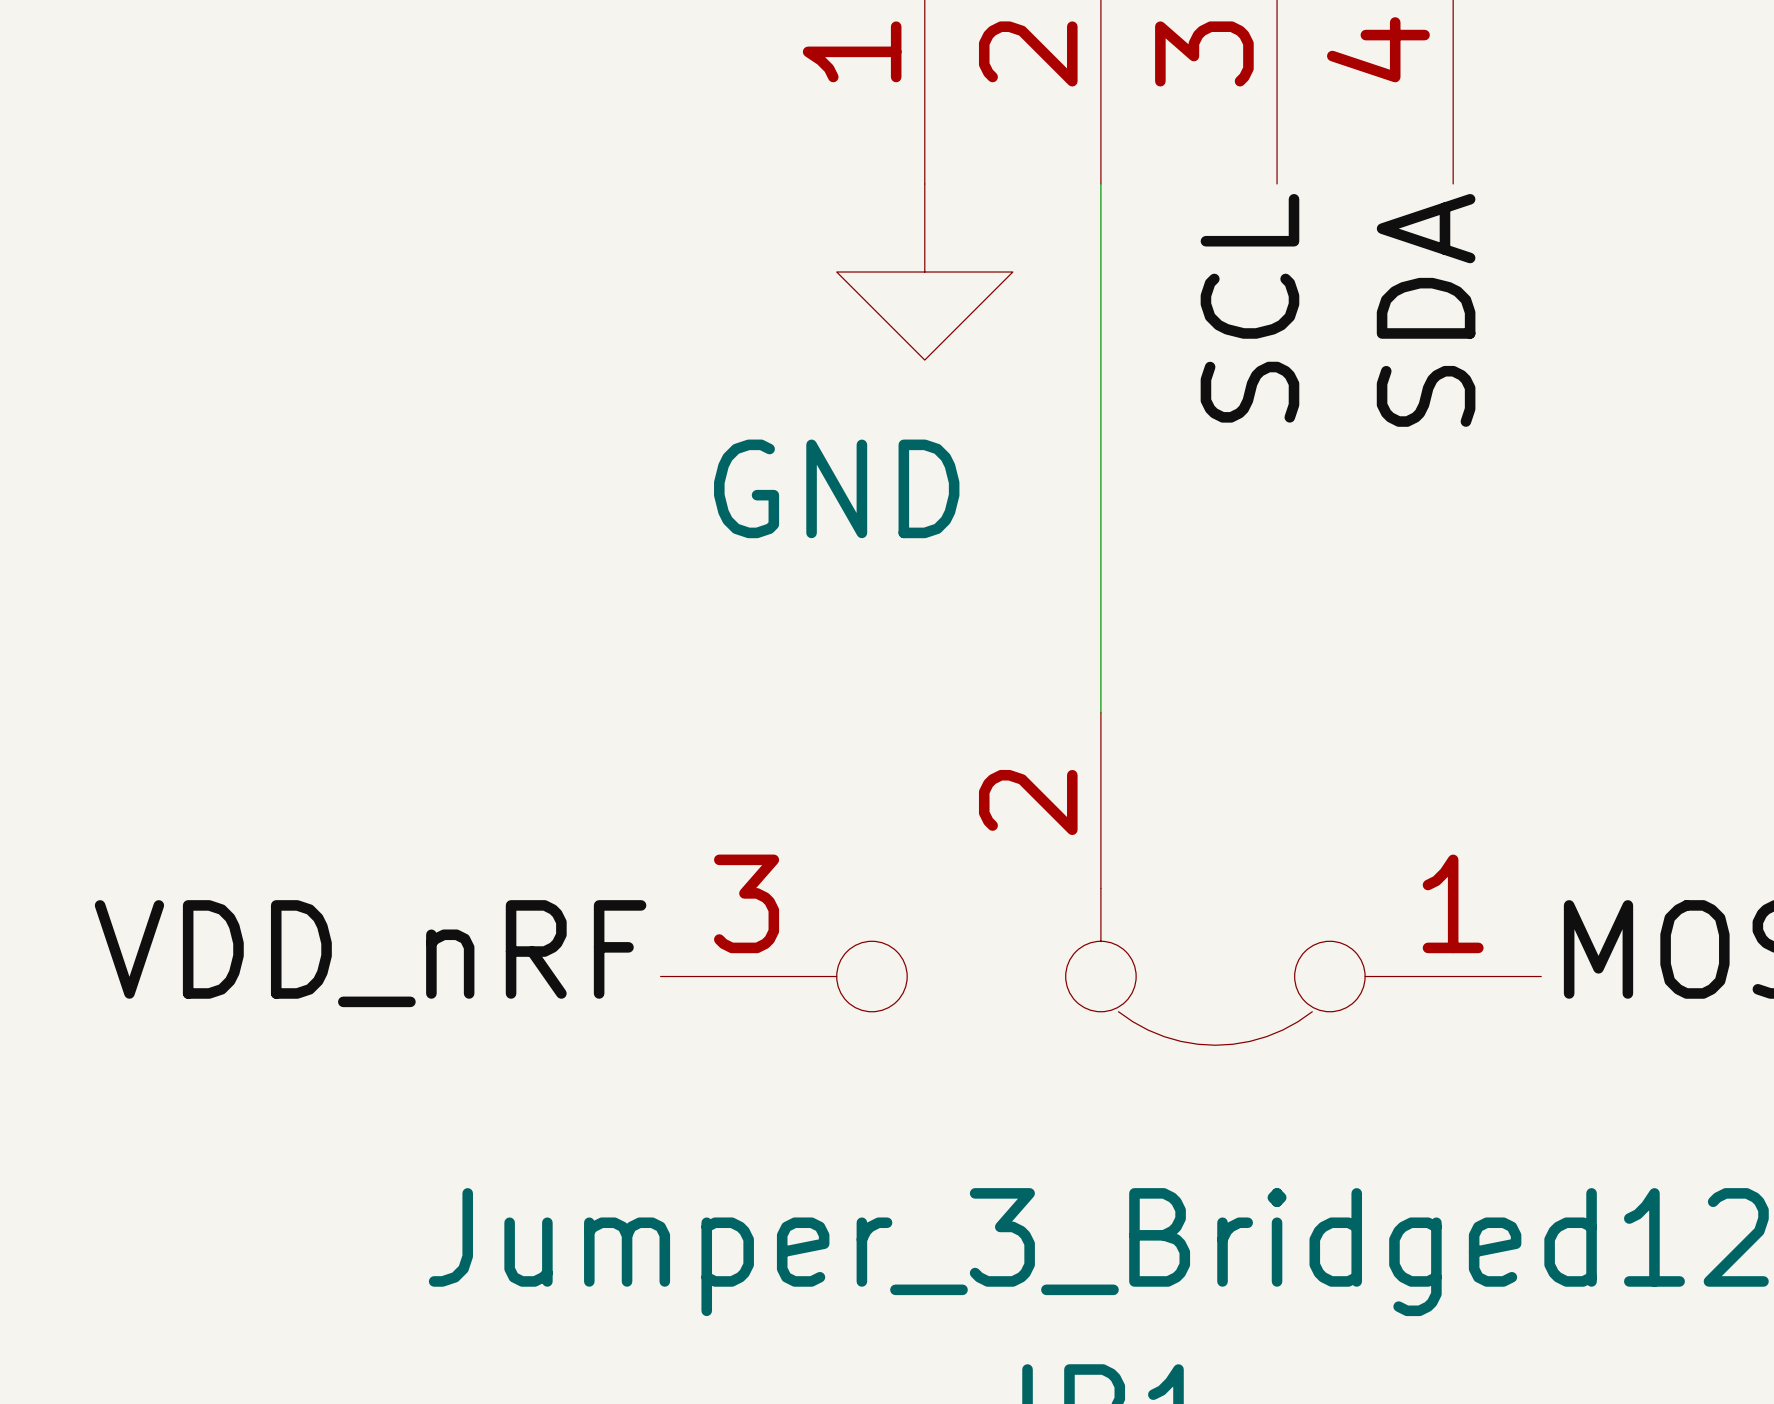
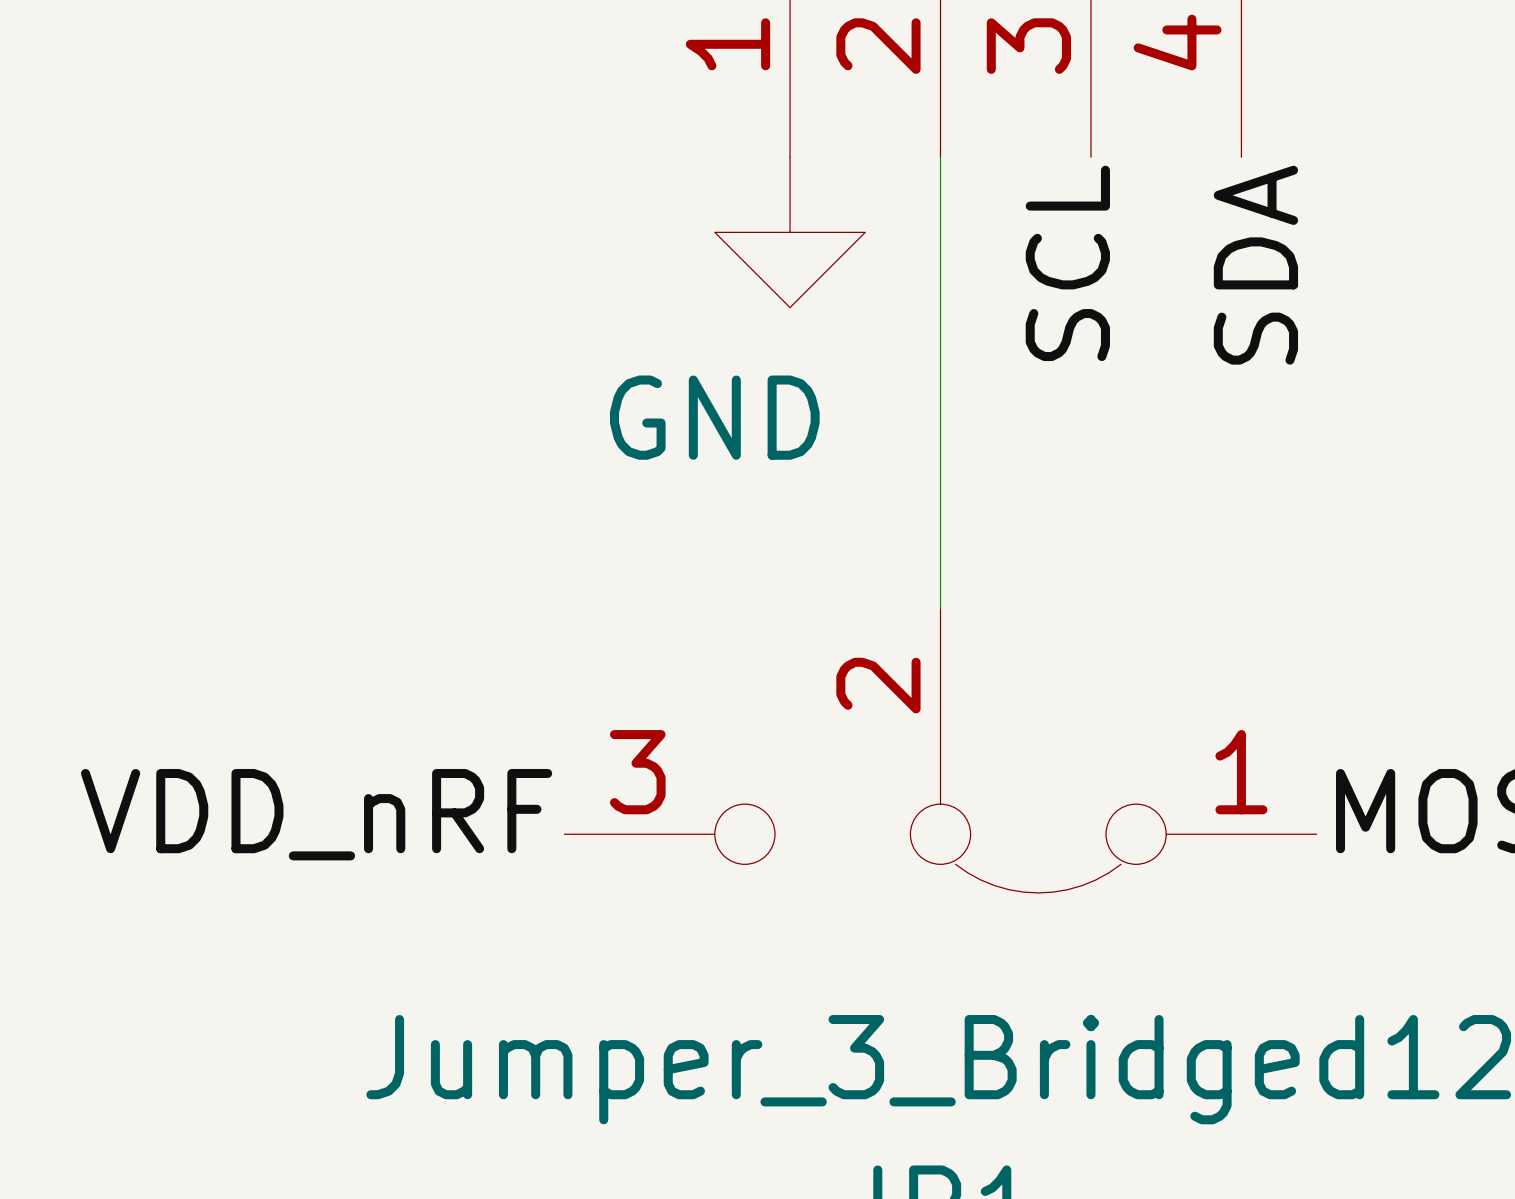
label position: SDA (1426, 310) -> SDA (1255, 265)

